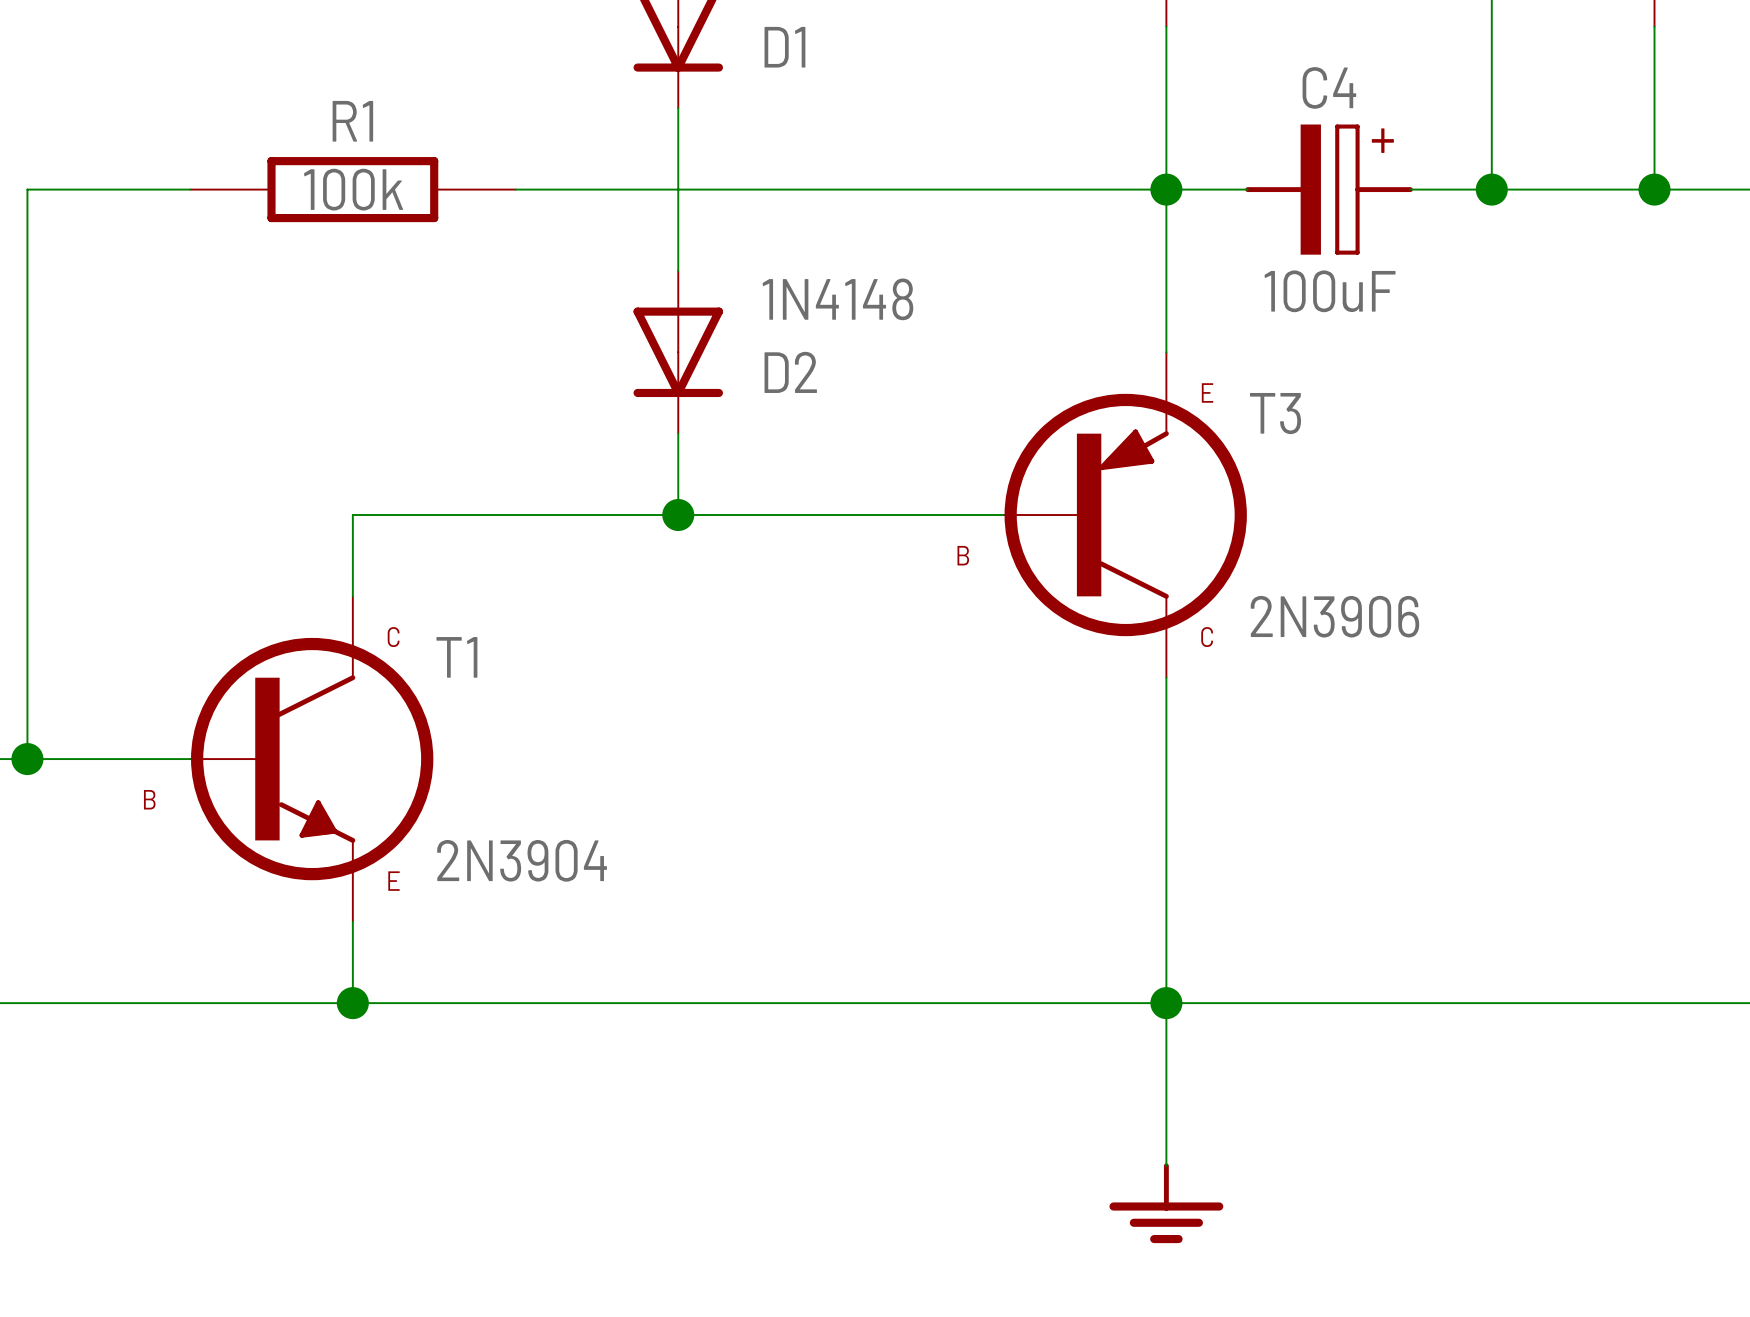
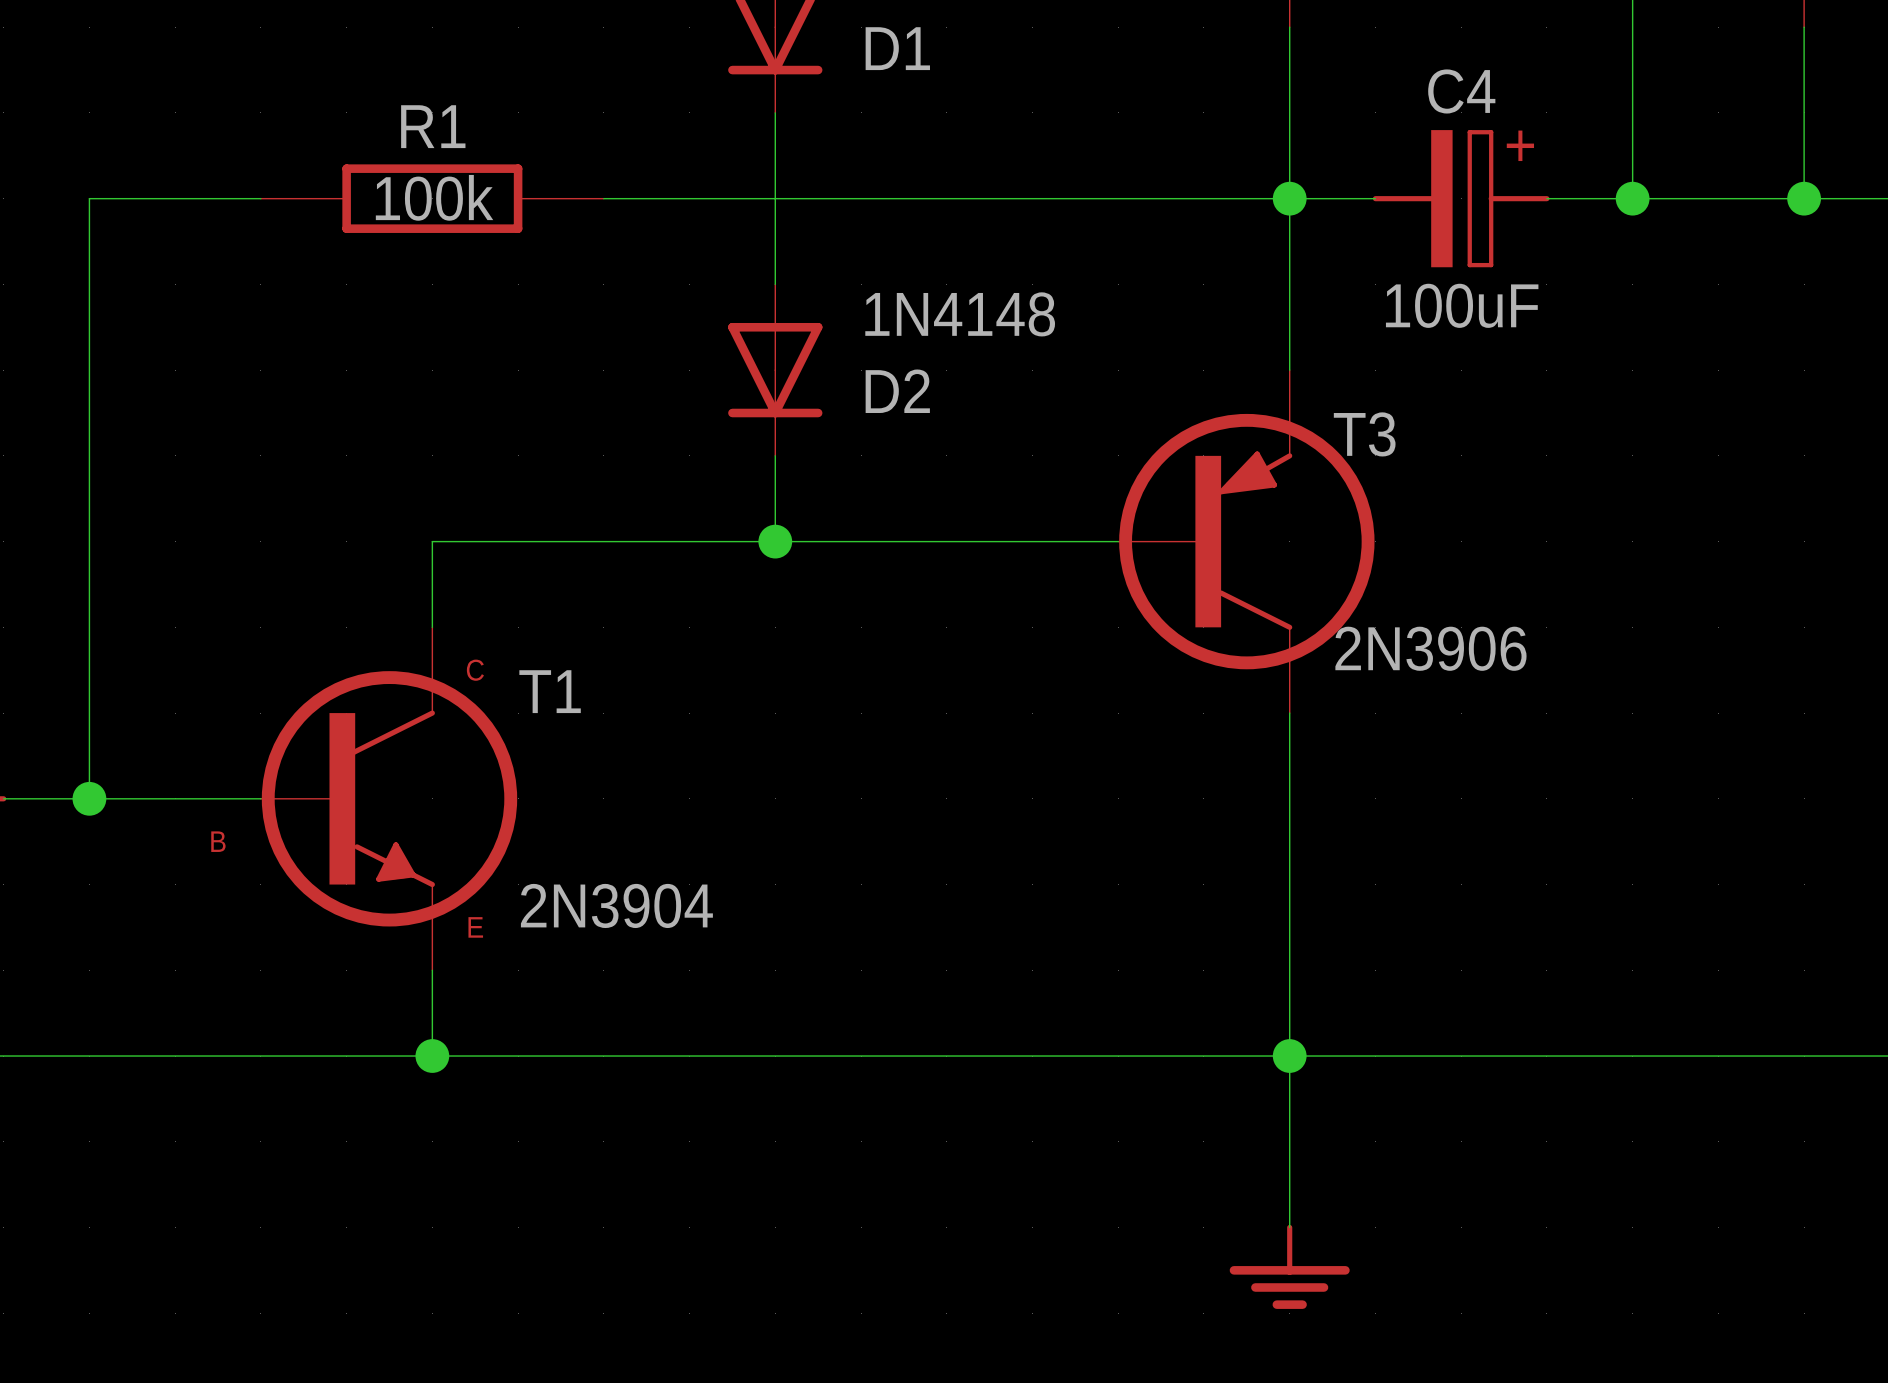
T3 text: E (1207, 392) -> none
T3 name position: T3 (1275, 413) -> T3 (1364, 434)
T3 text: B (963, 555) -> none
T3 value position: 2N3906 (1334, 616) -> 2N3906 (1430, 648)
T3 text: C (1207, 637) -> none

